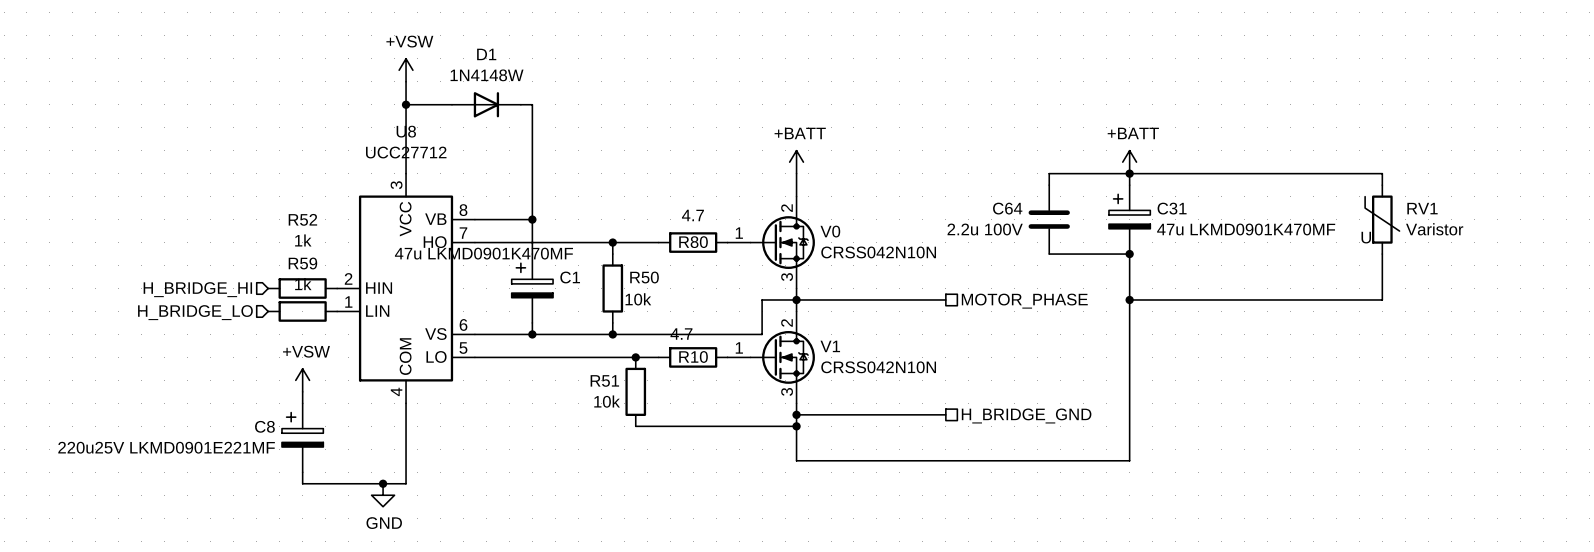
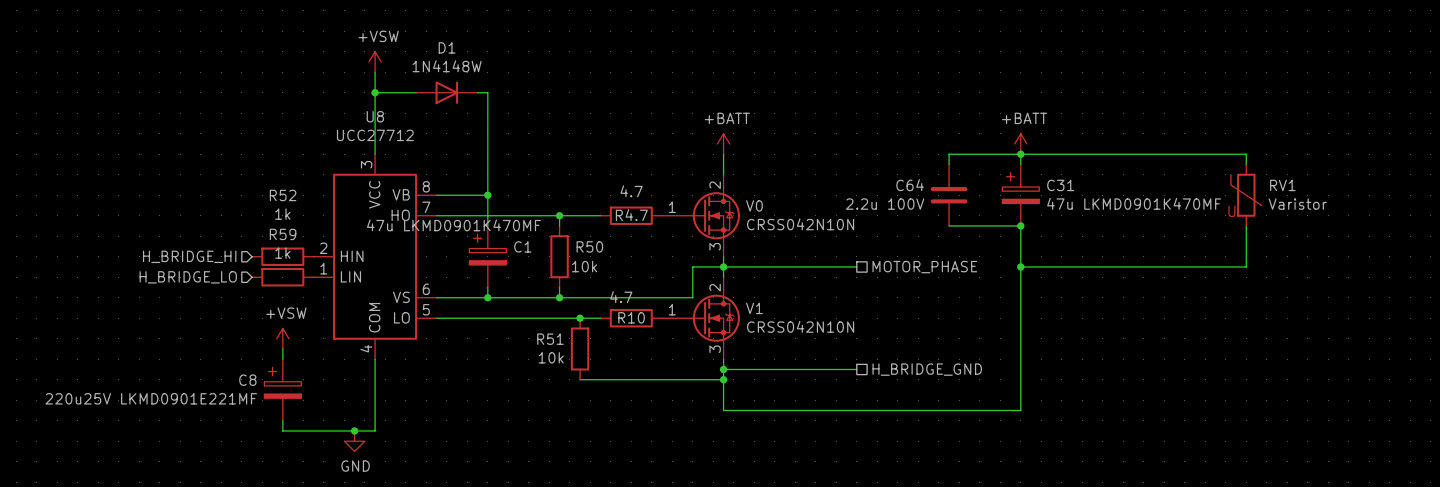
R80 name: R80 (693, 242) -> R4.7 (631, 215)

